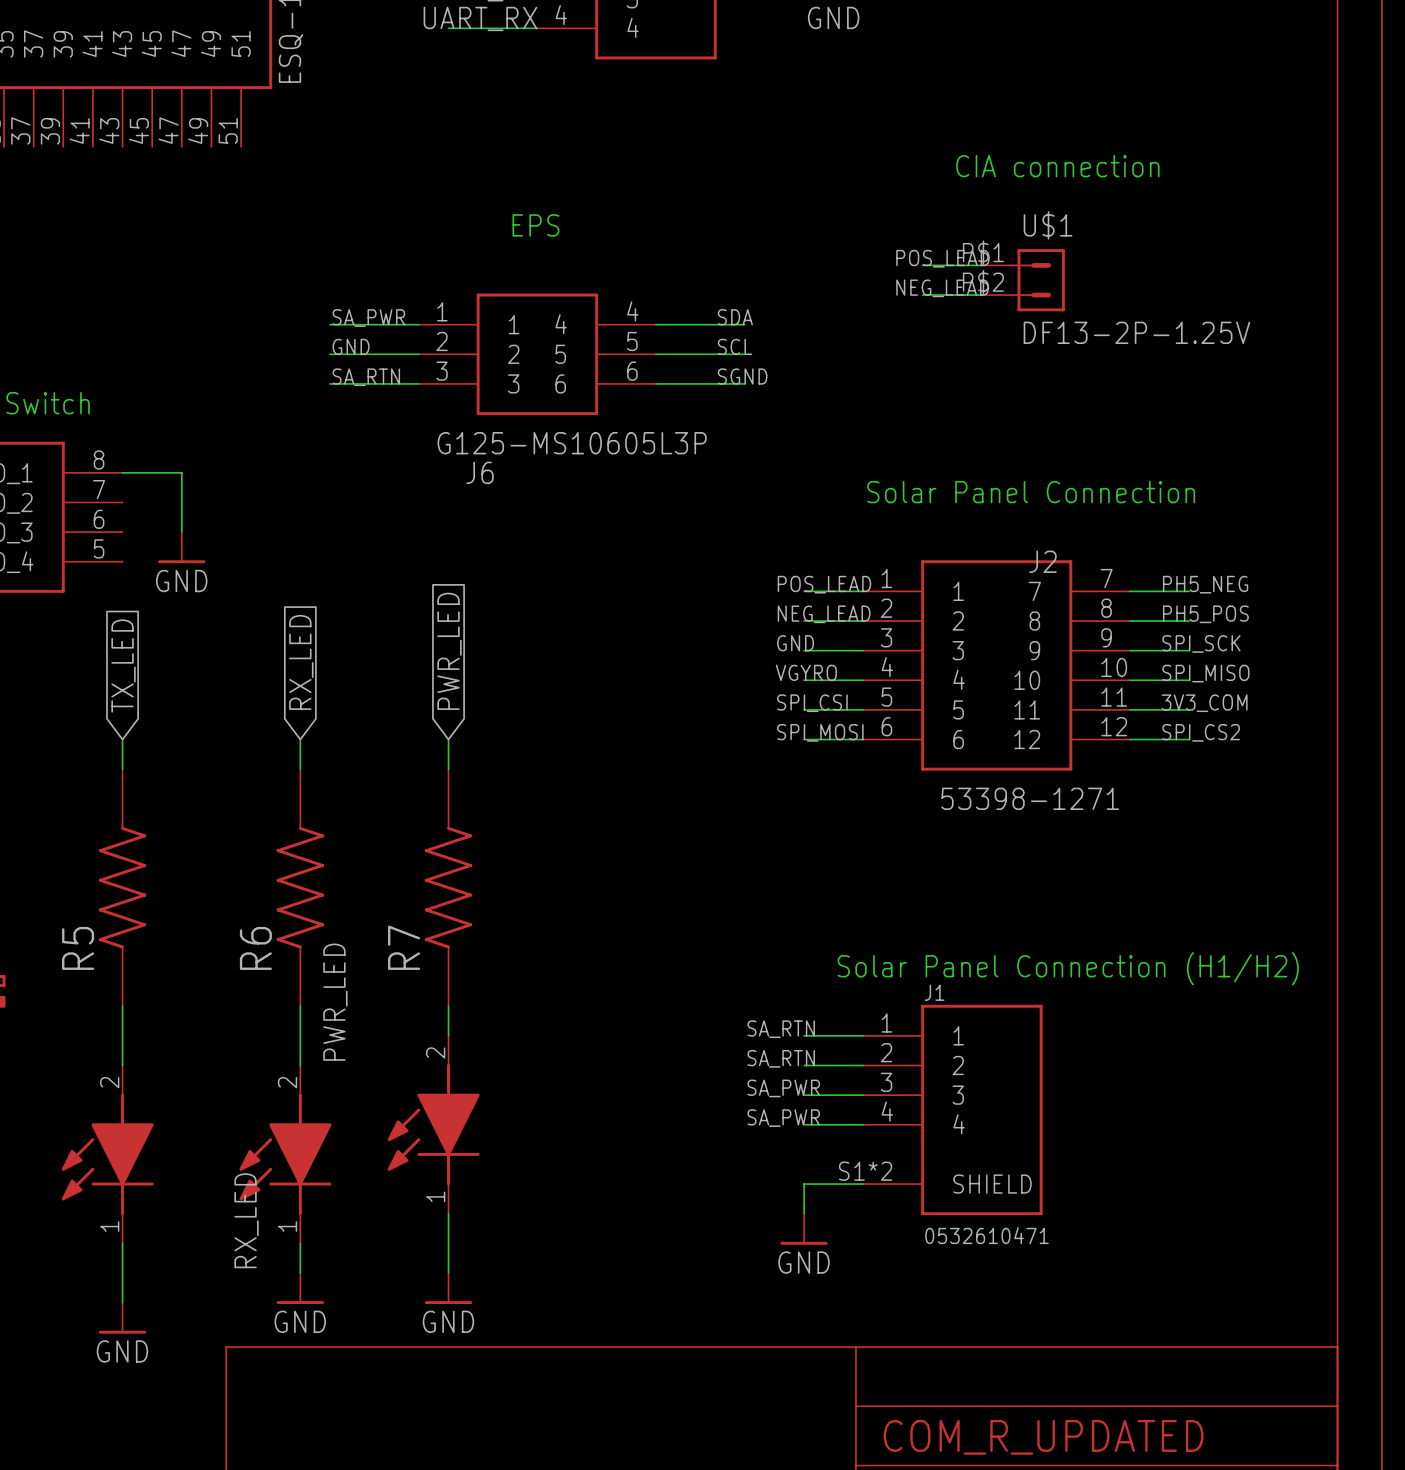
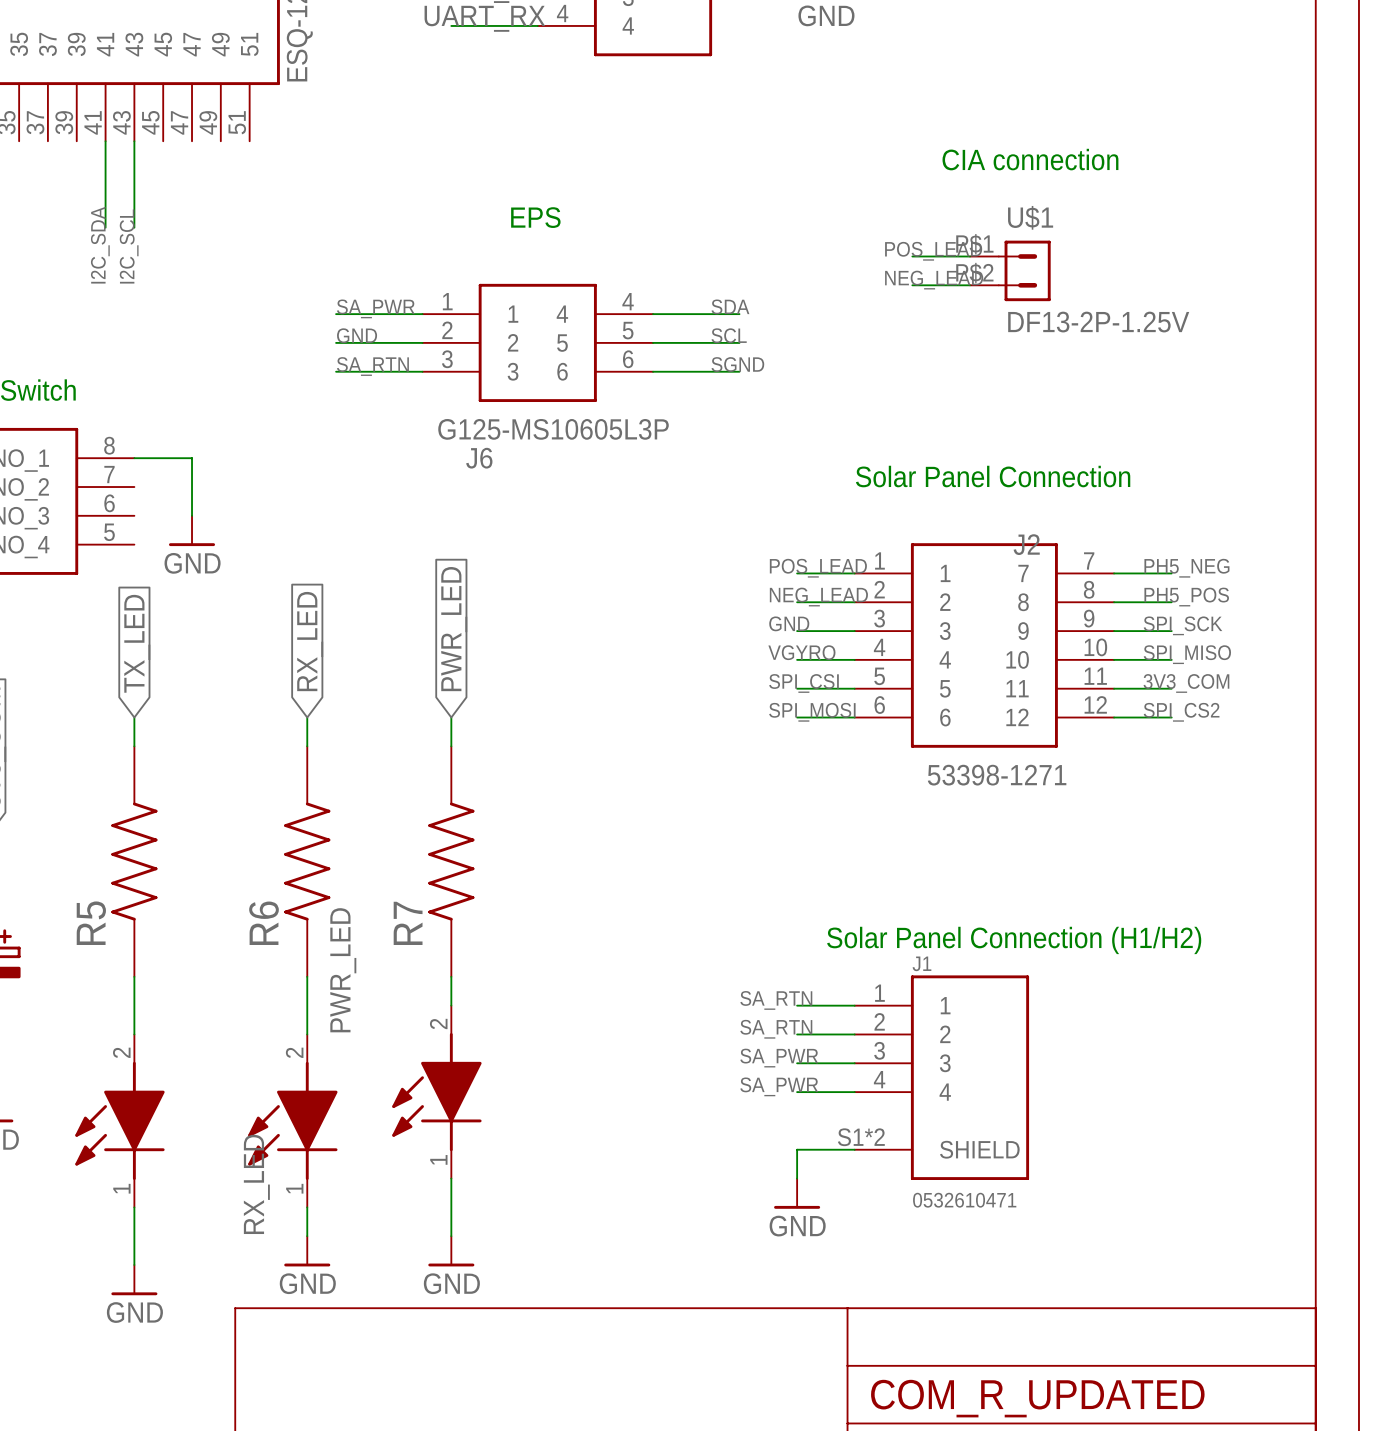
wire: none -> (105, 141) (105, 227)
wire: none -> (134, 141) (134, 227)
label: none -> I2C_SDA (100, 245)
label: none -> I2C_SCL (129, 246)

